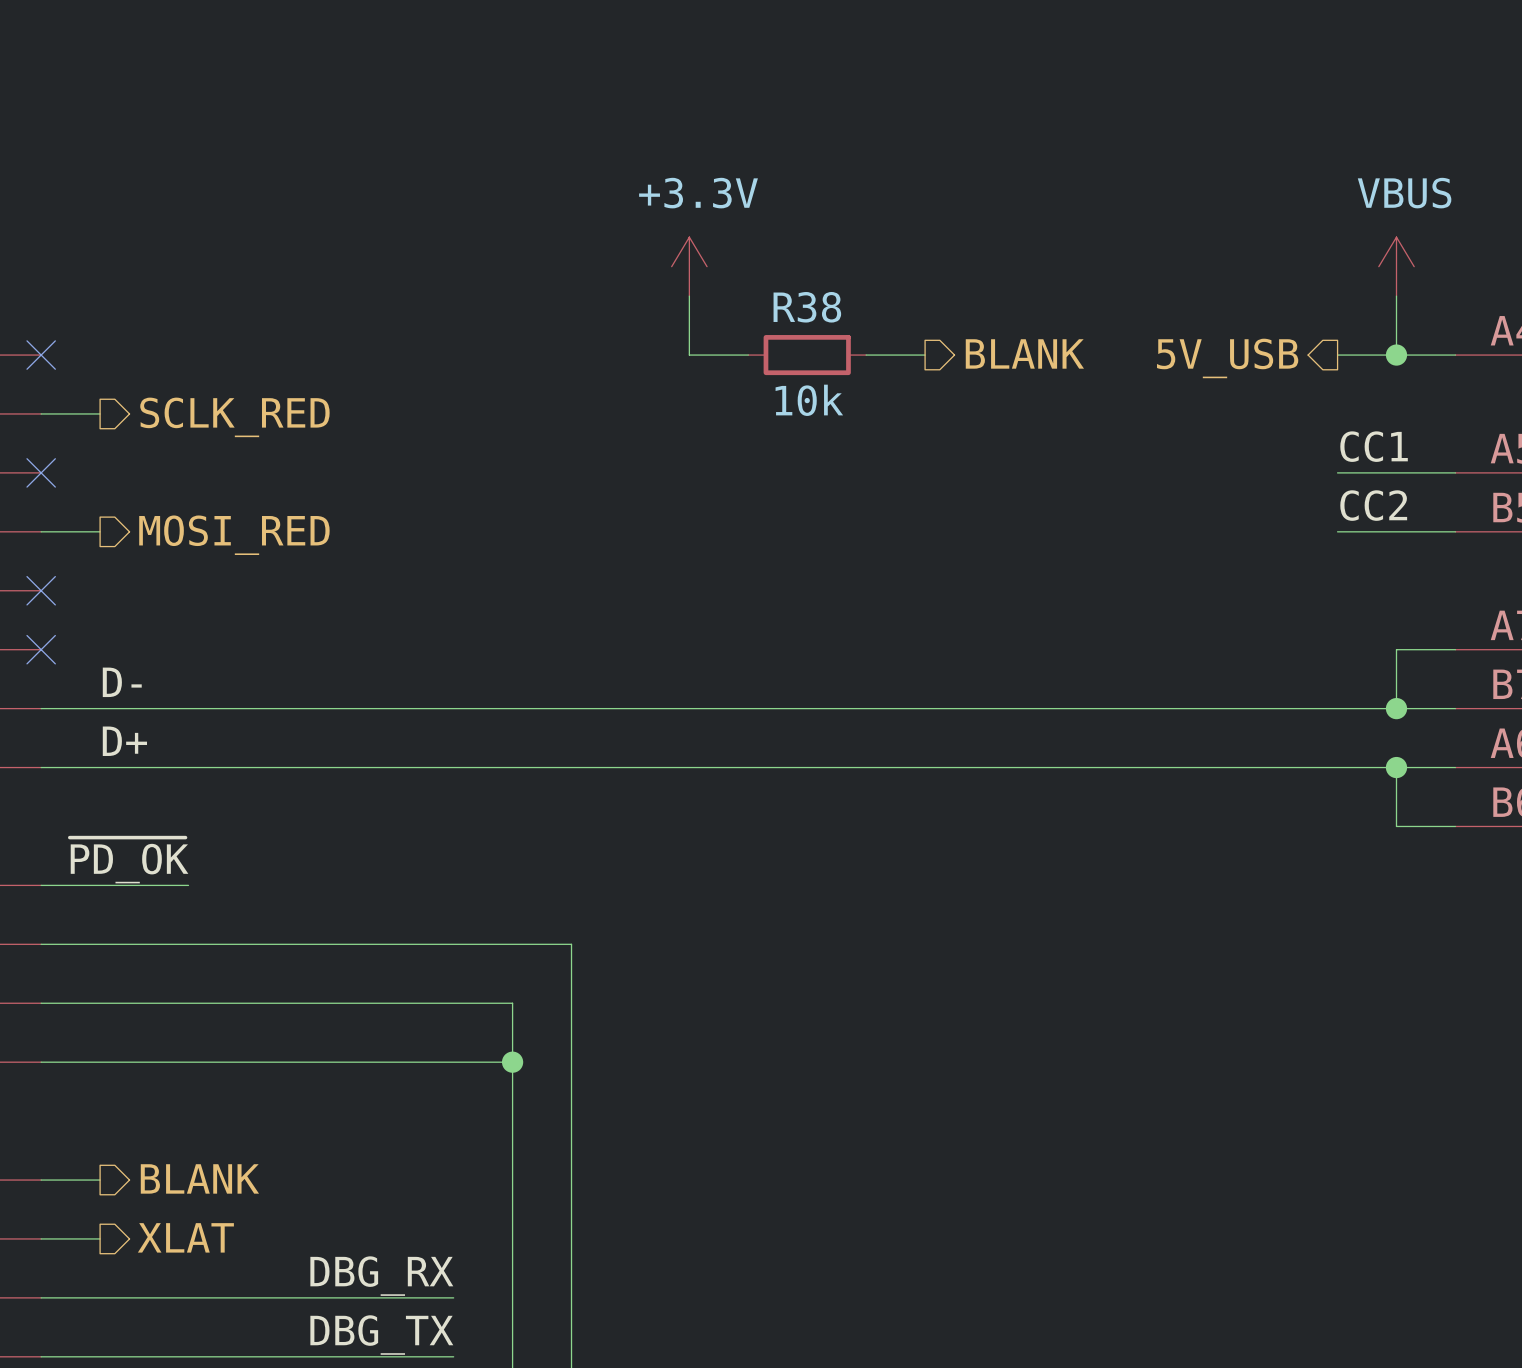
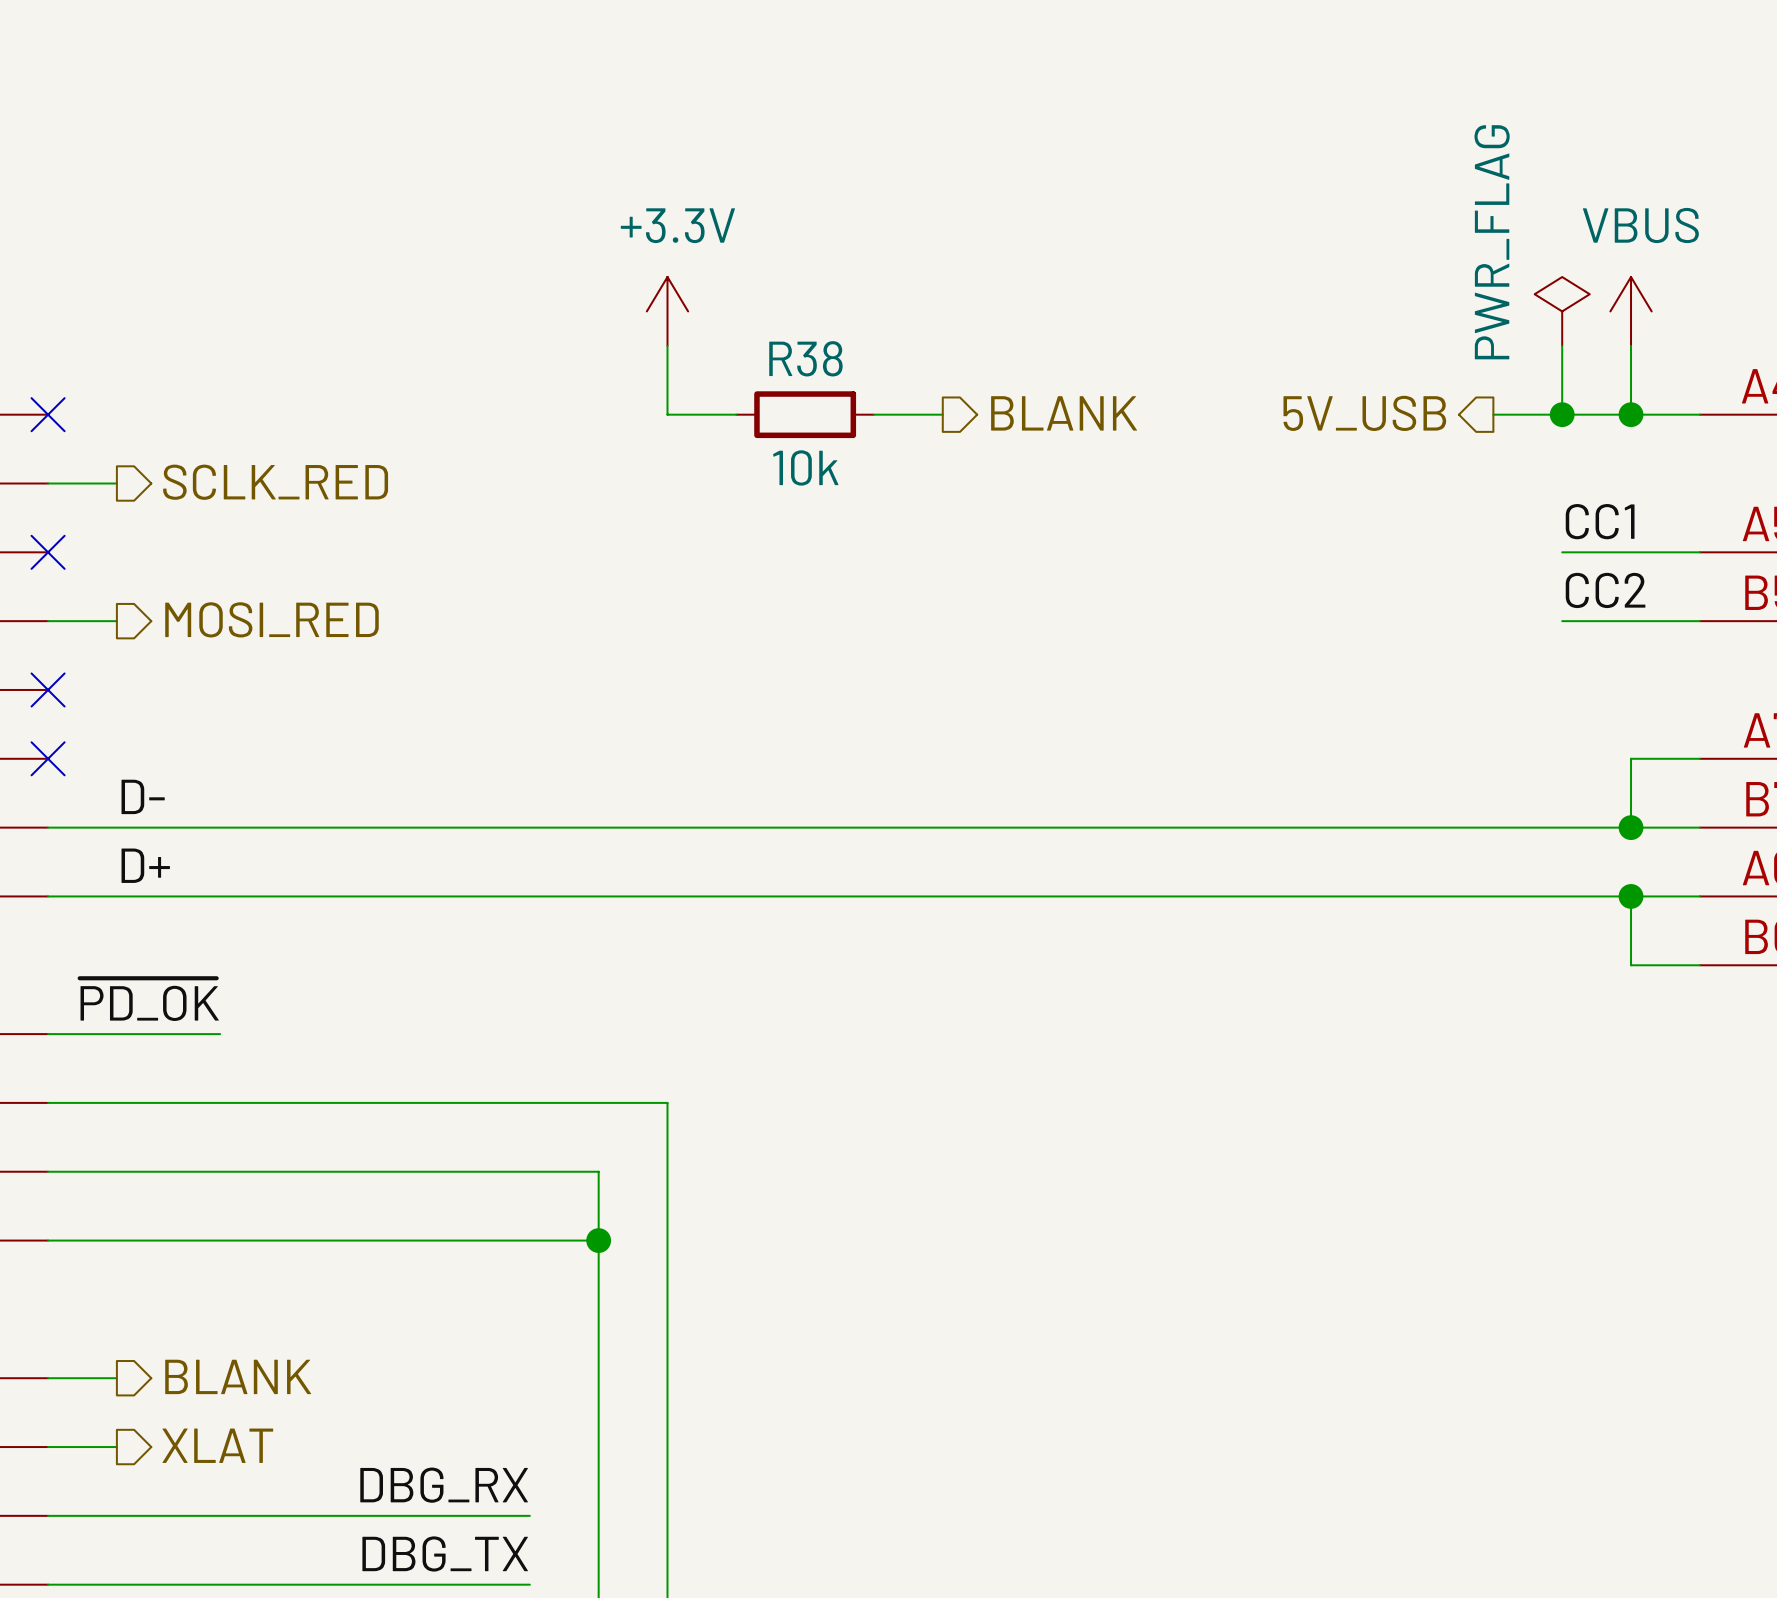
power symbol position: +3.3V (689, 266) -> +3.3V (667, 311)
power symbol: none -> PWR_FLAG (1562, 311)
wire: none -> (667, 345) (667, 414) (736, 414)
wire: (689, 296) (689, 355) (748, 355) -> (942, 414) (873, 414)
wire: none -> (1562, 345) (1562, 414) (1493, 414)
hierarchical label position: BLANK (1024, 353) -> BLANK (1064, 413)
R38 position: (807, 355) -> (805, 414)
wire: (866, 355) (925, 355) -> none
junction: none -> (1562, 414)
hierarchical label position: 5V_USB (1227, 358) -> 5V_USB (1364, 413)

